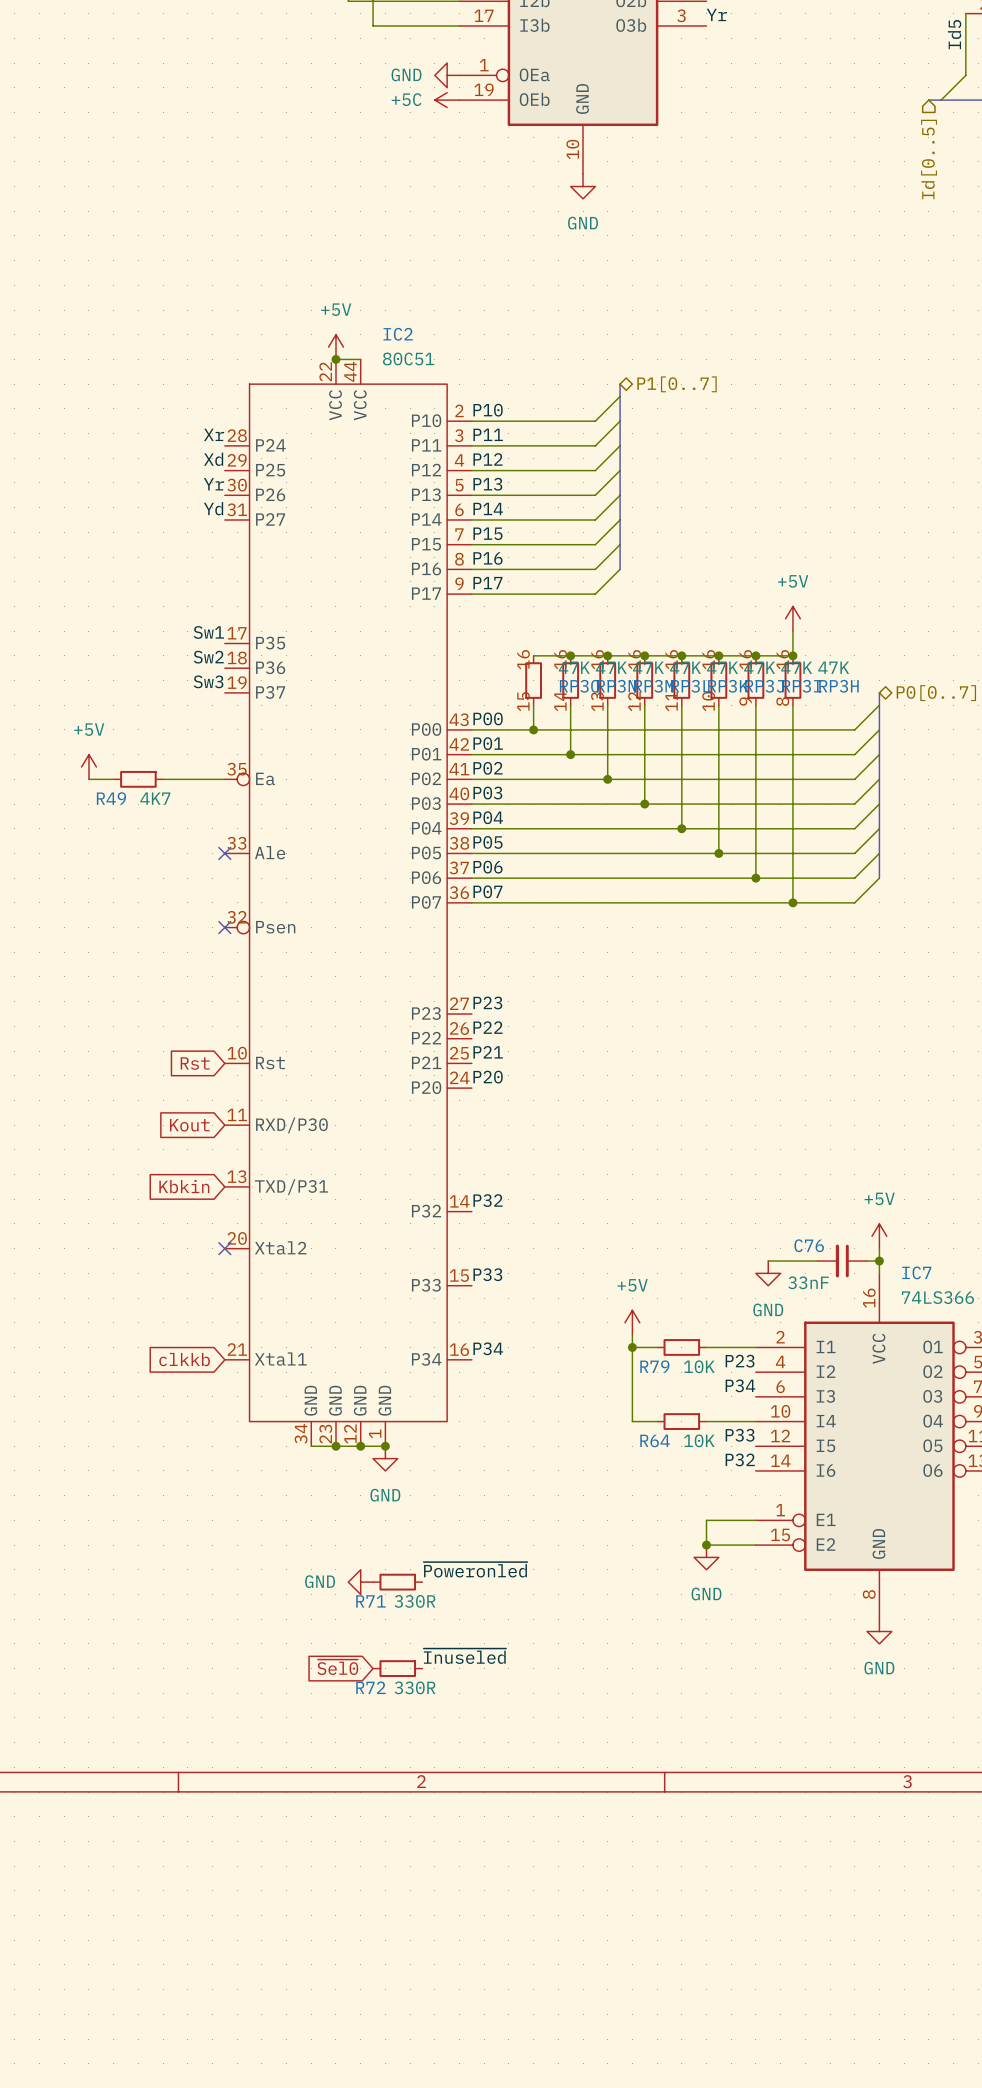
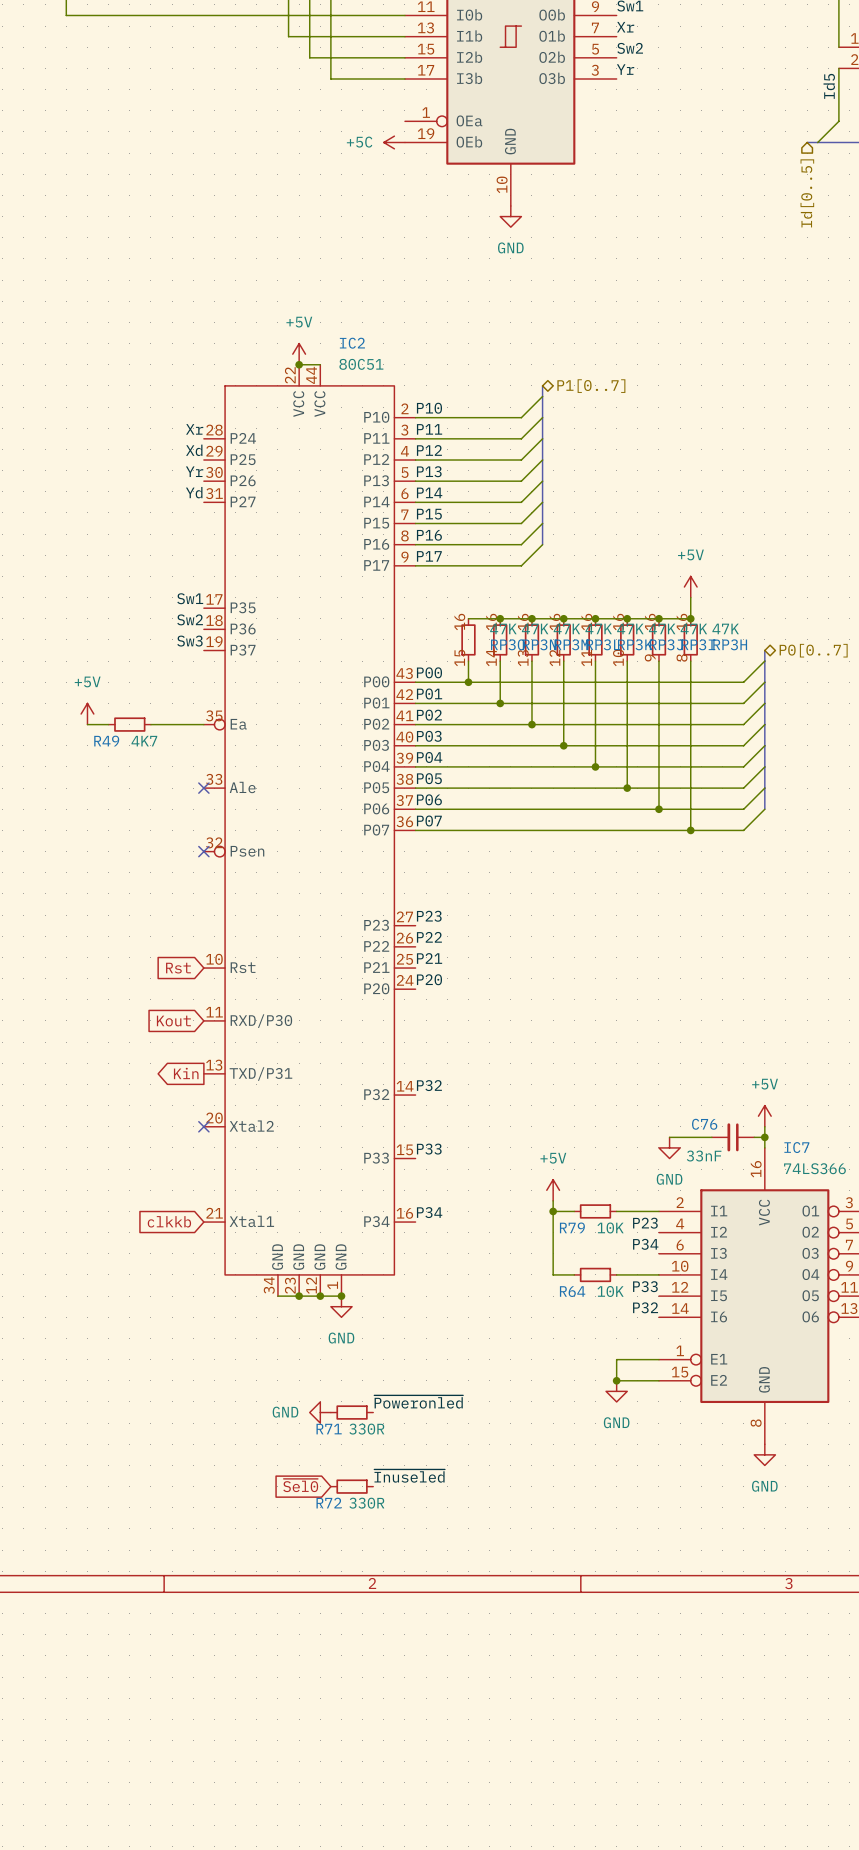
power symbol: GND (447, 75) -> none
global label shape: input (184, 1186) -> output (186, 1073)
global label: Kbkin (184, 1186) -> Kin (186, 1073)

